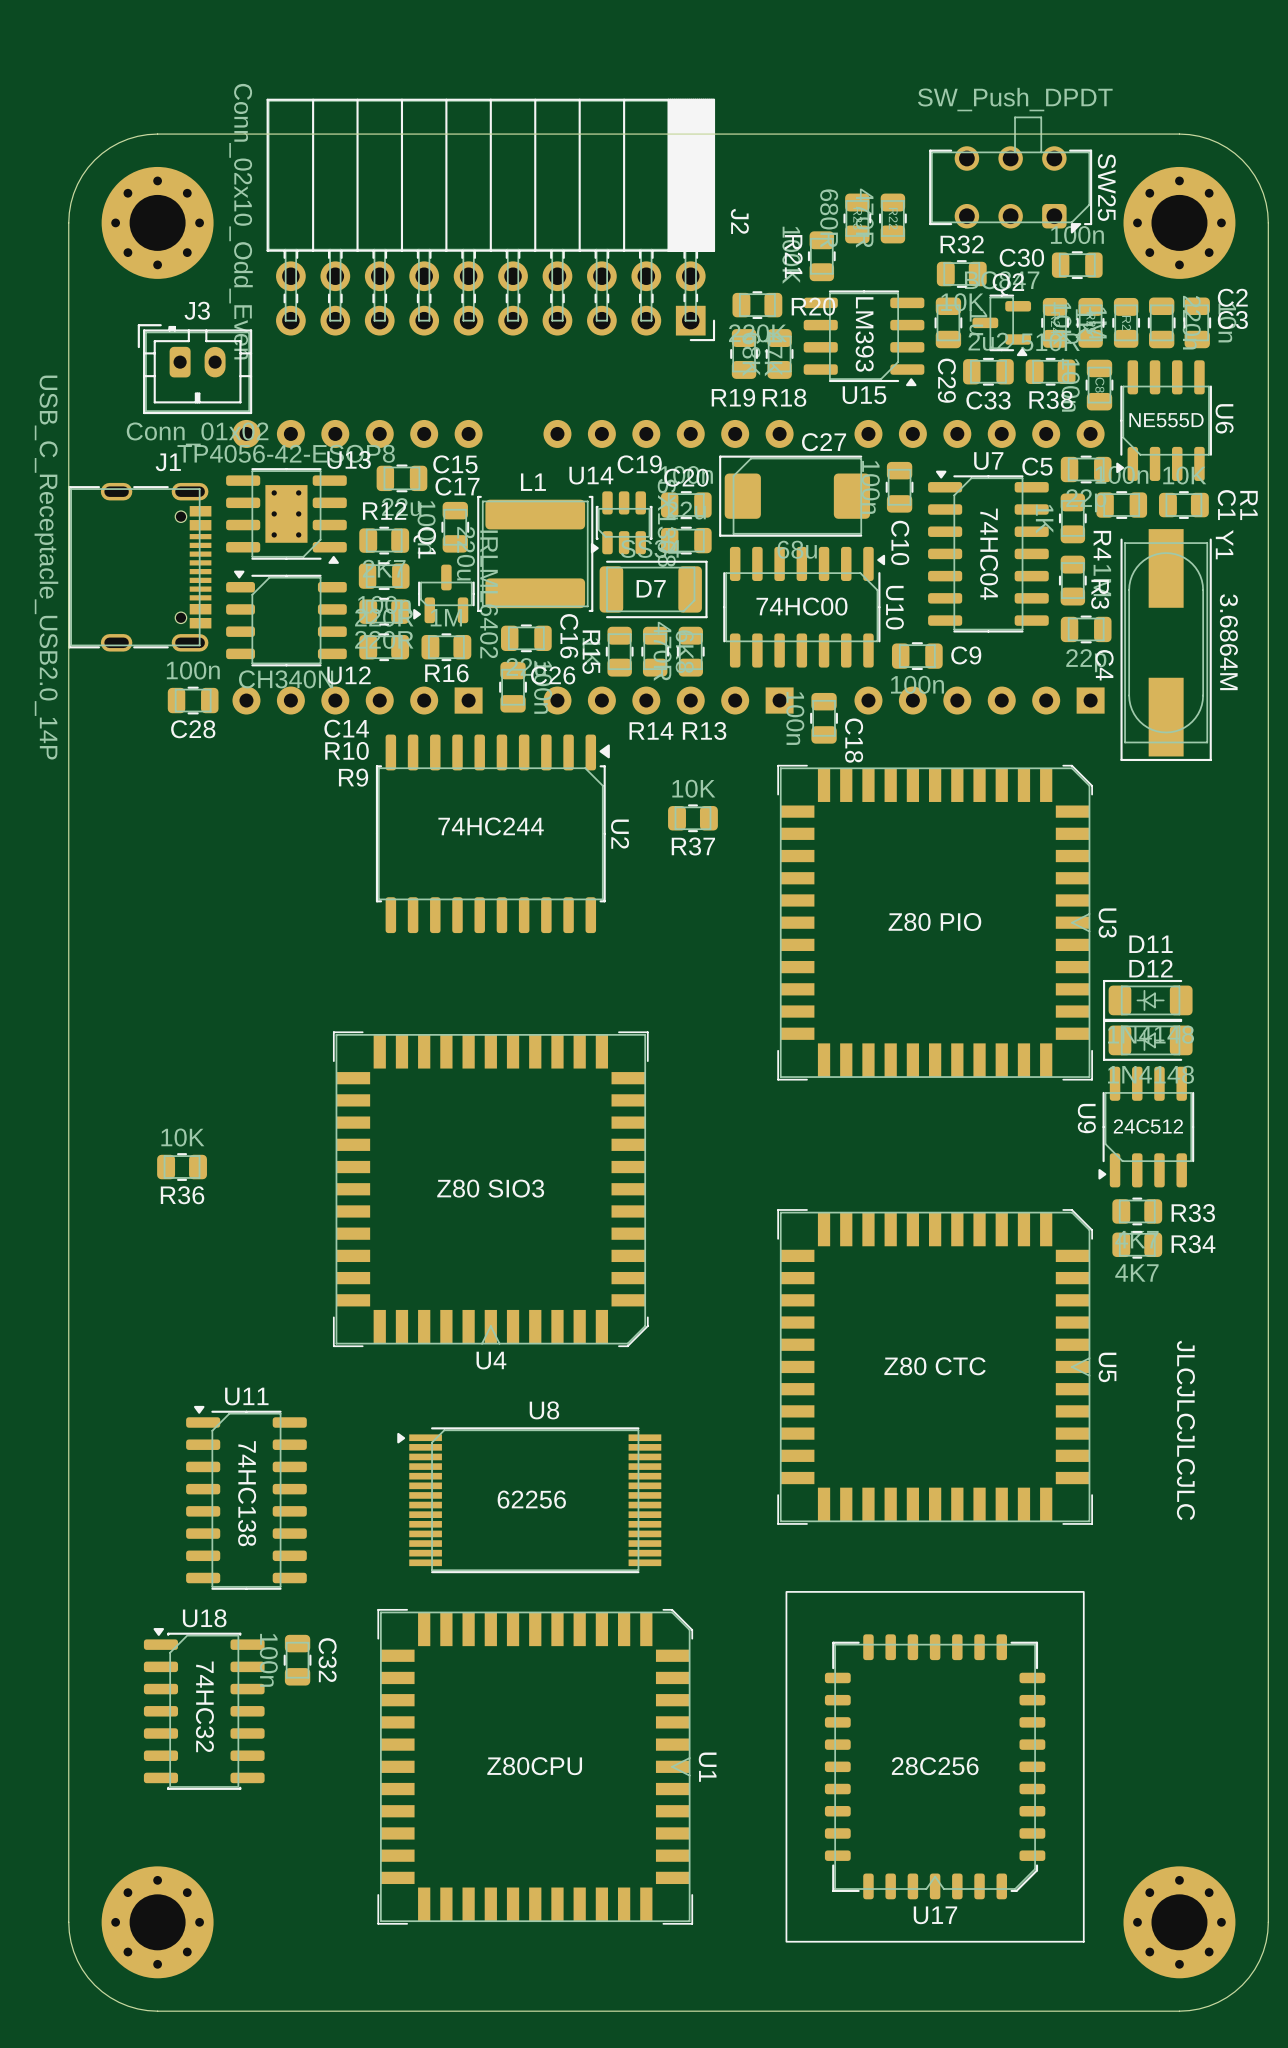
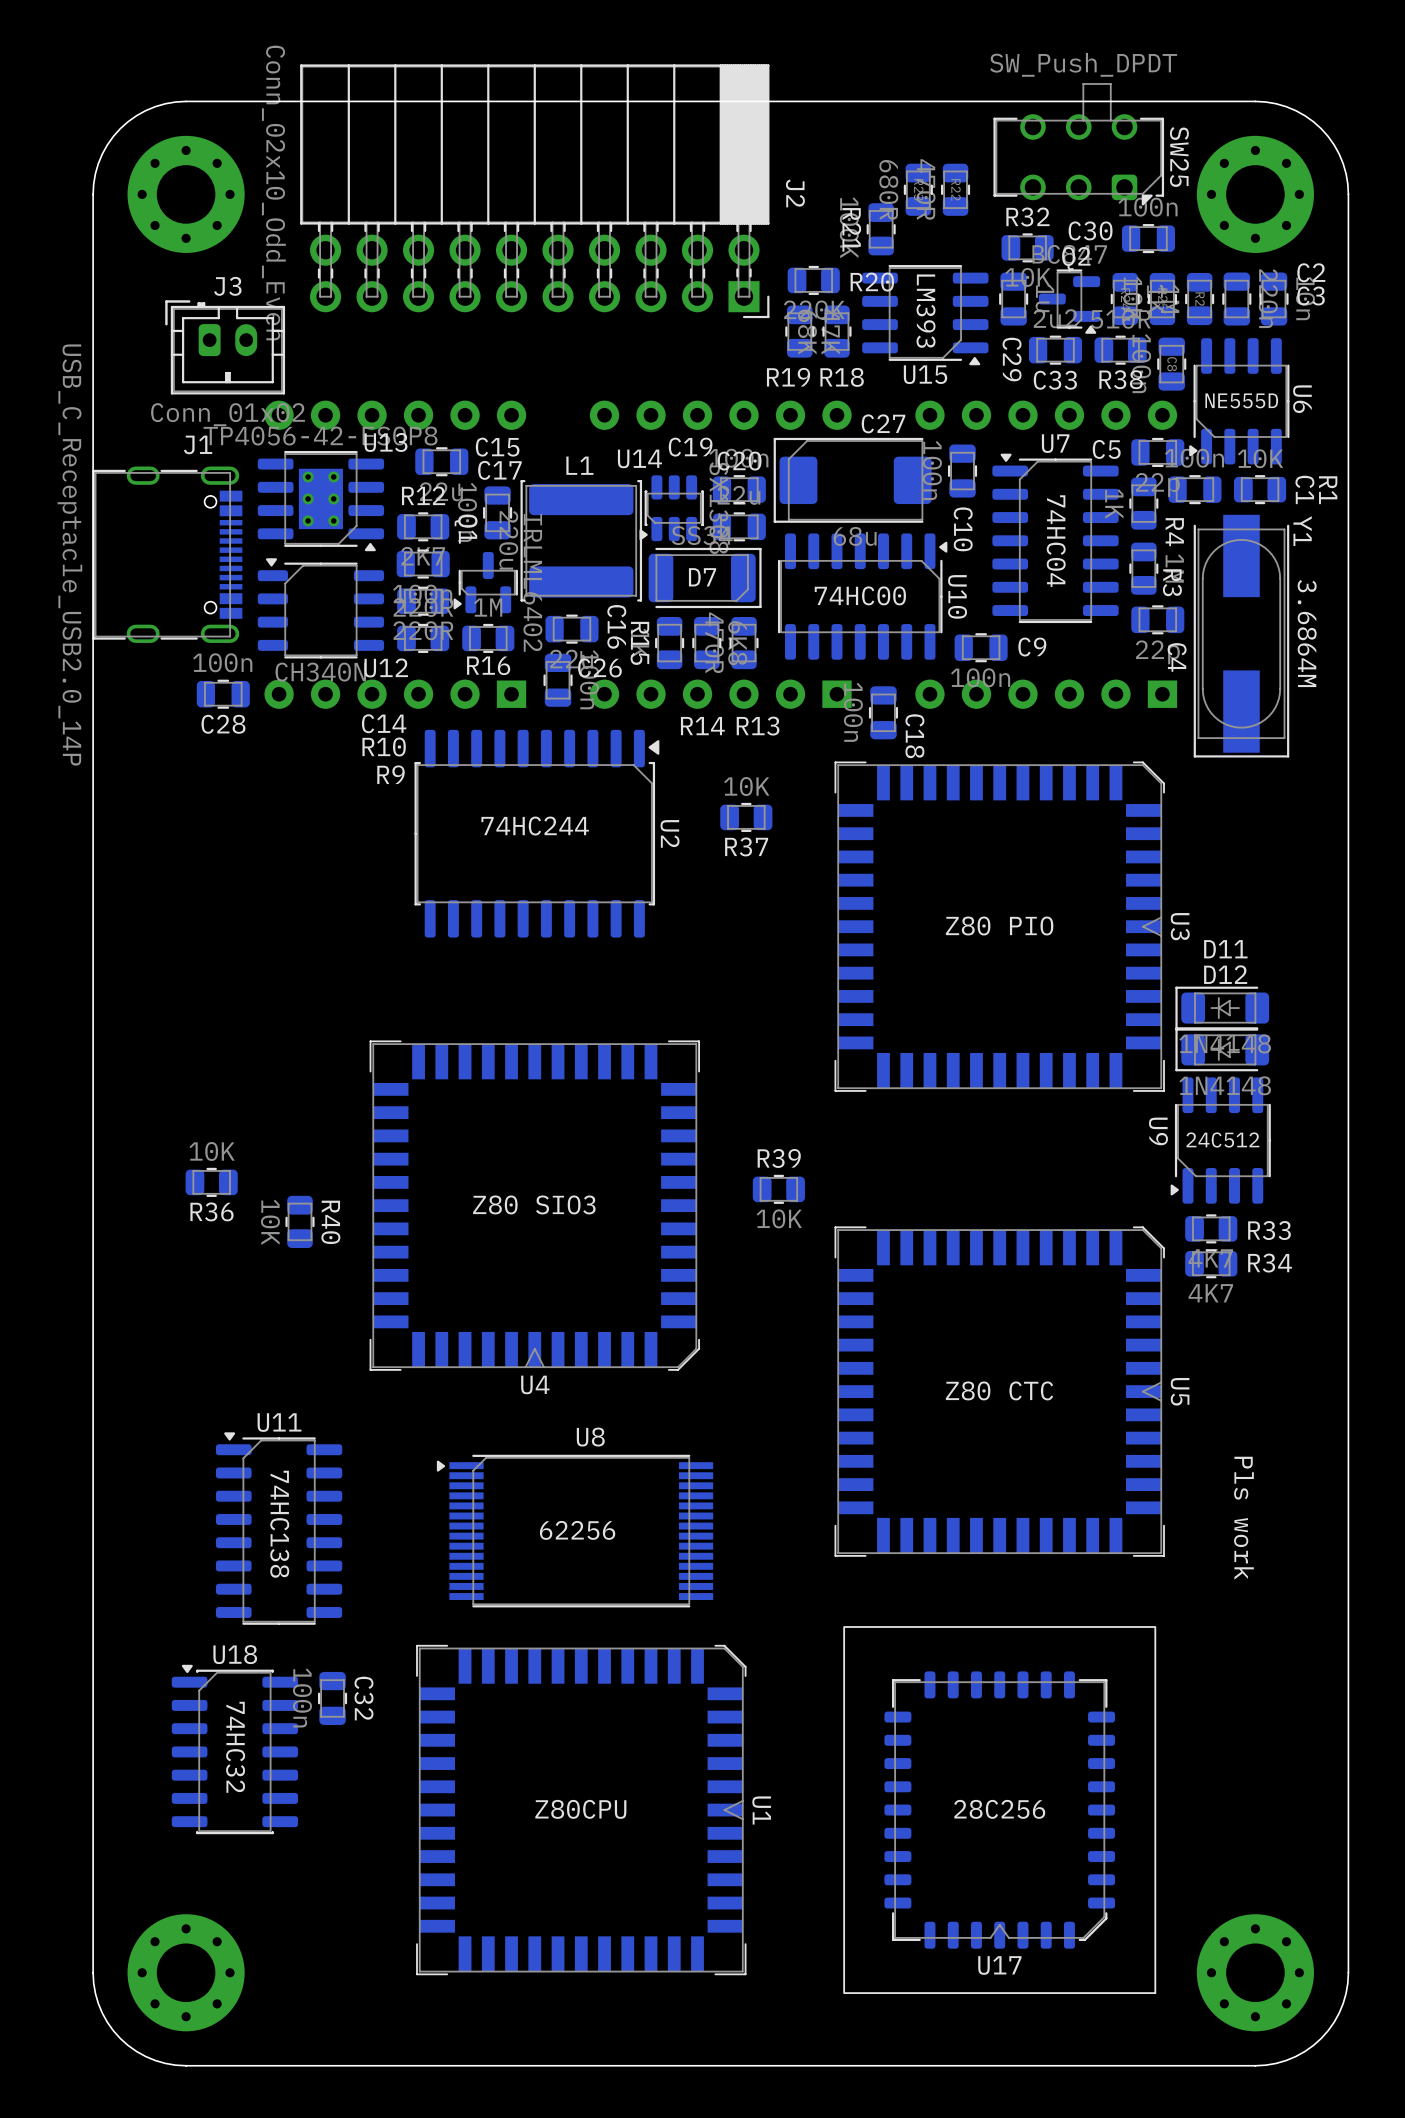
R39: none -> 10K (778, 1189)
R40: none -> 10K (300, 1221)
text: JLCJLCJLCJLC (1185, 1430) -> none
text: none -> Pls work (1243, 1518)

